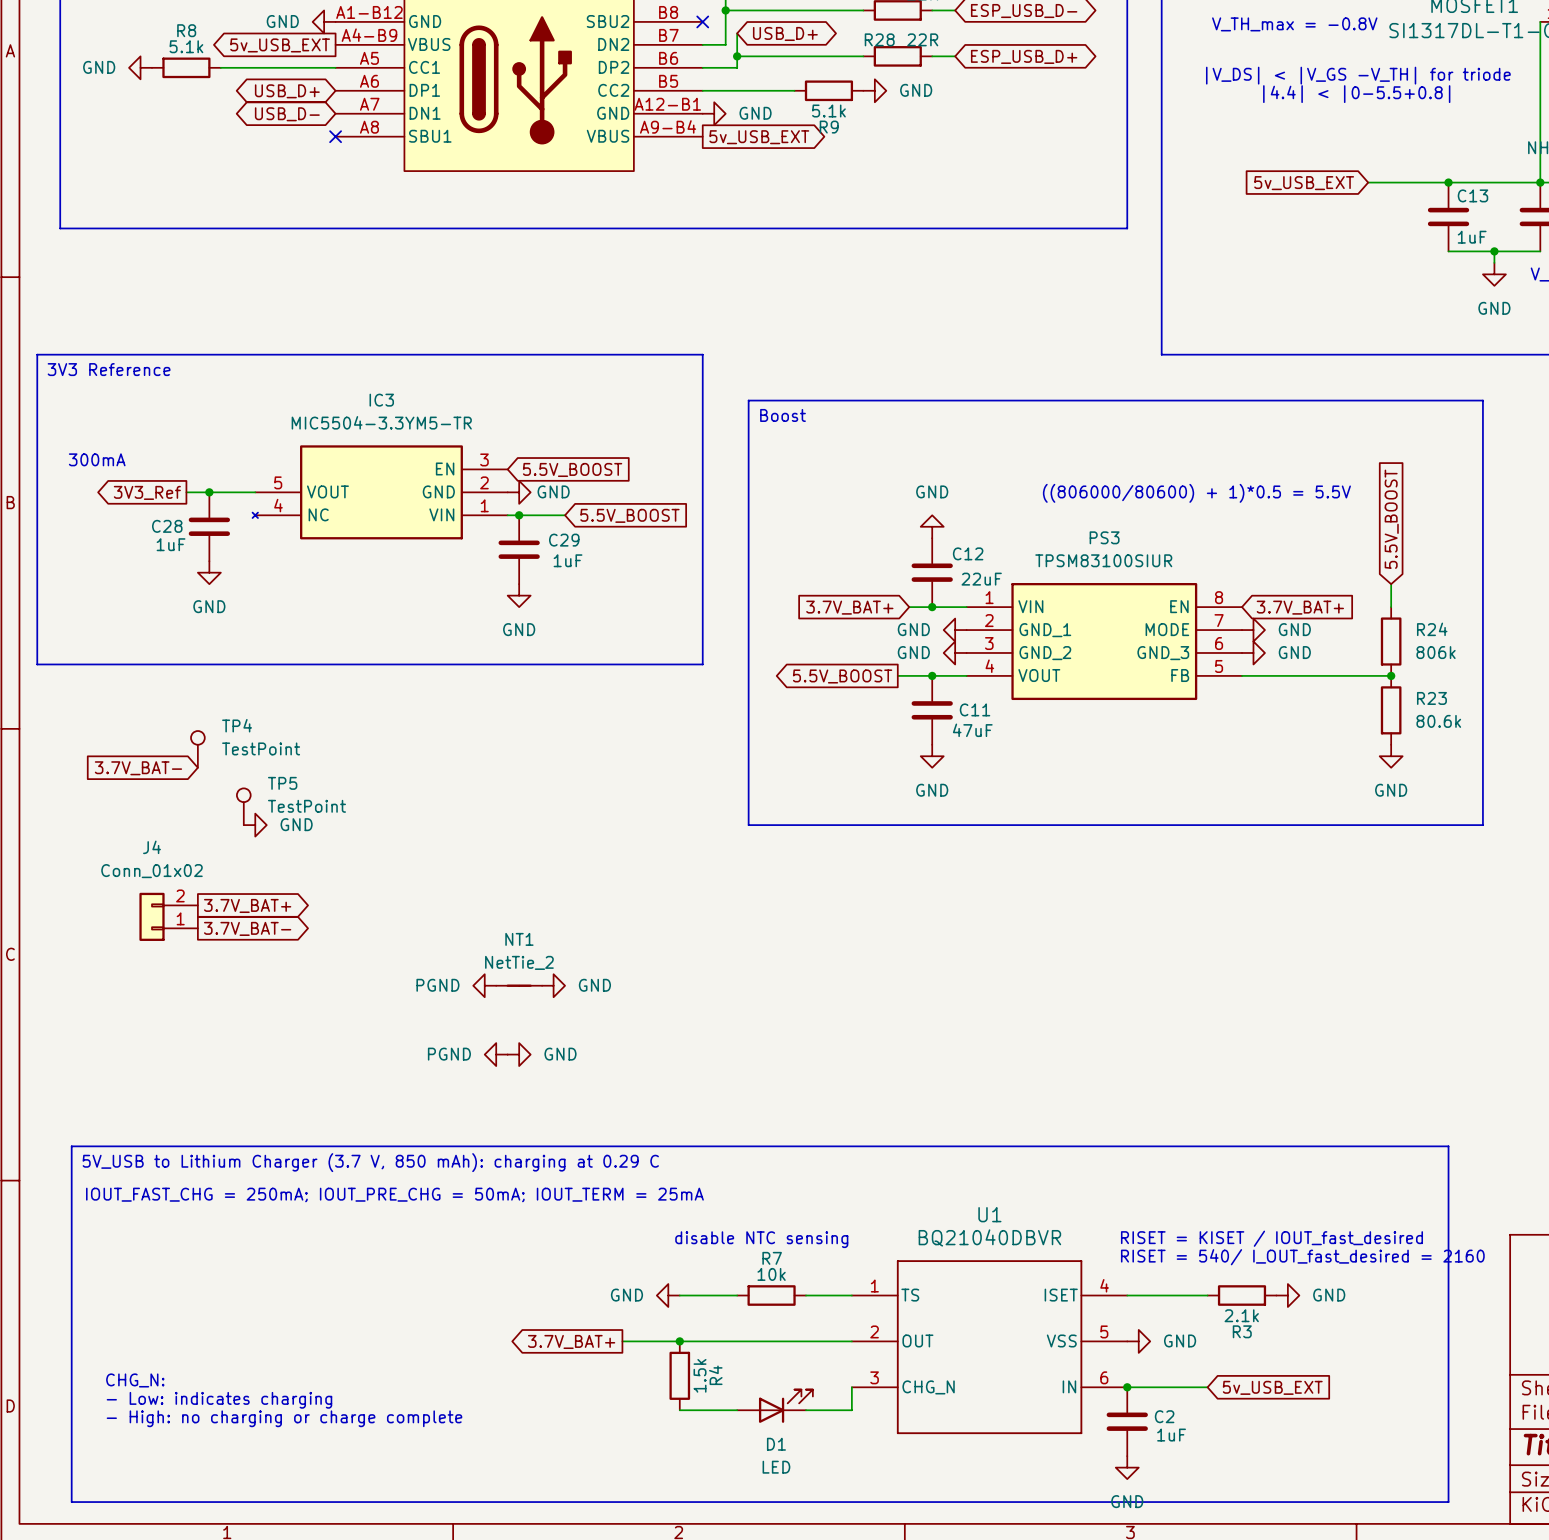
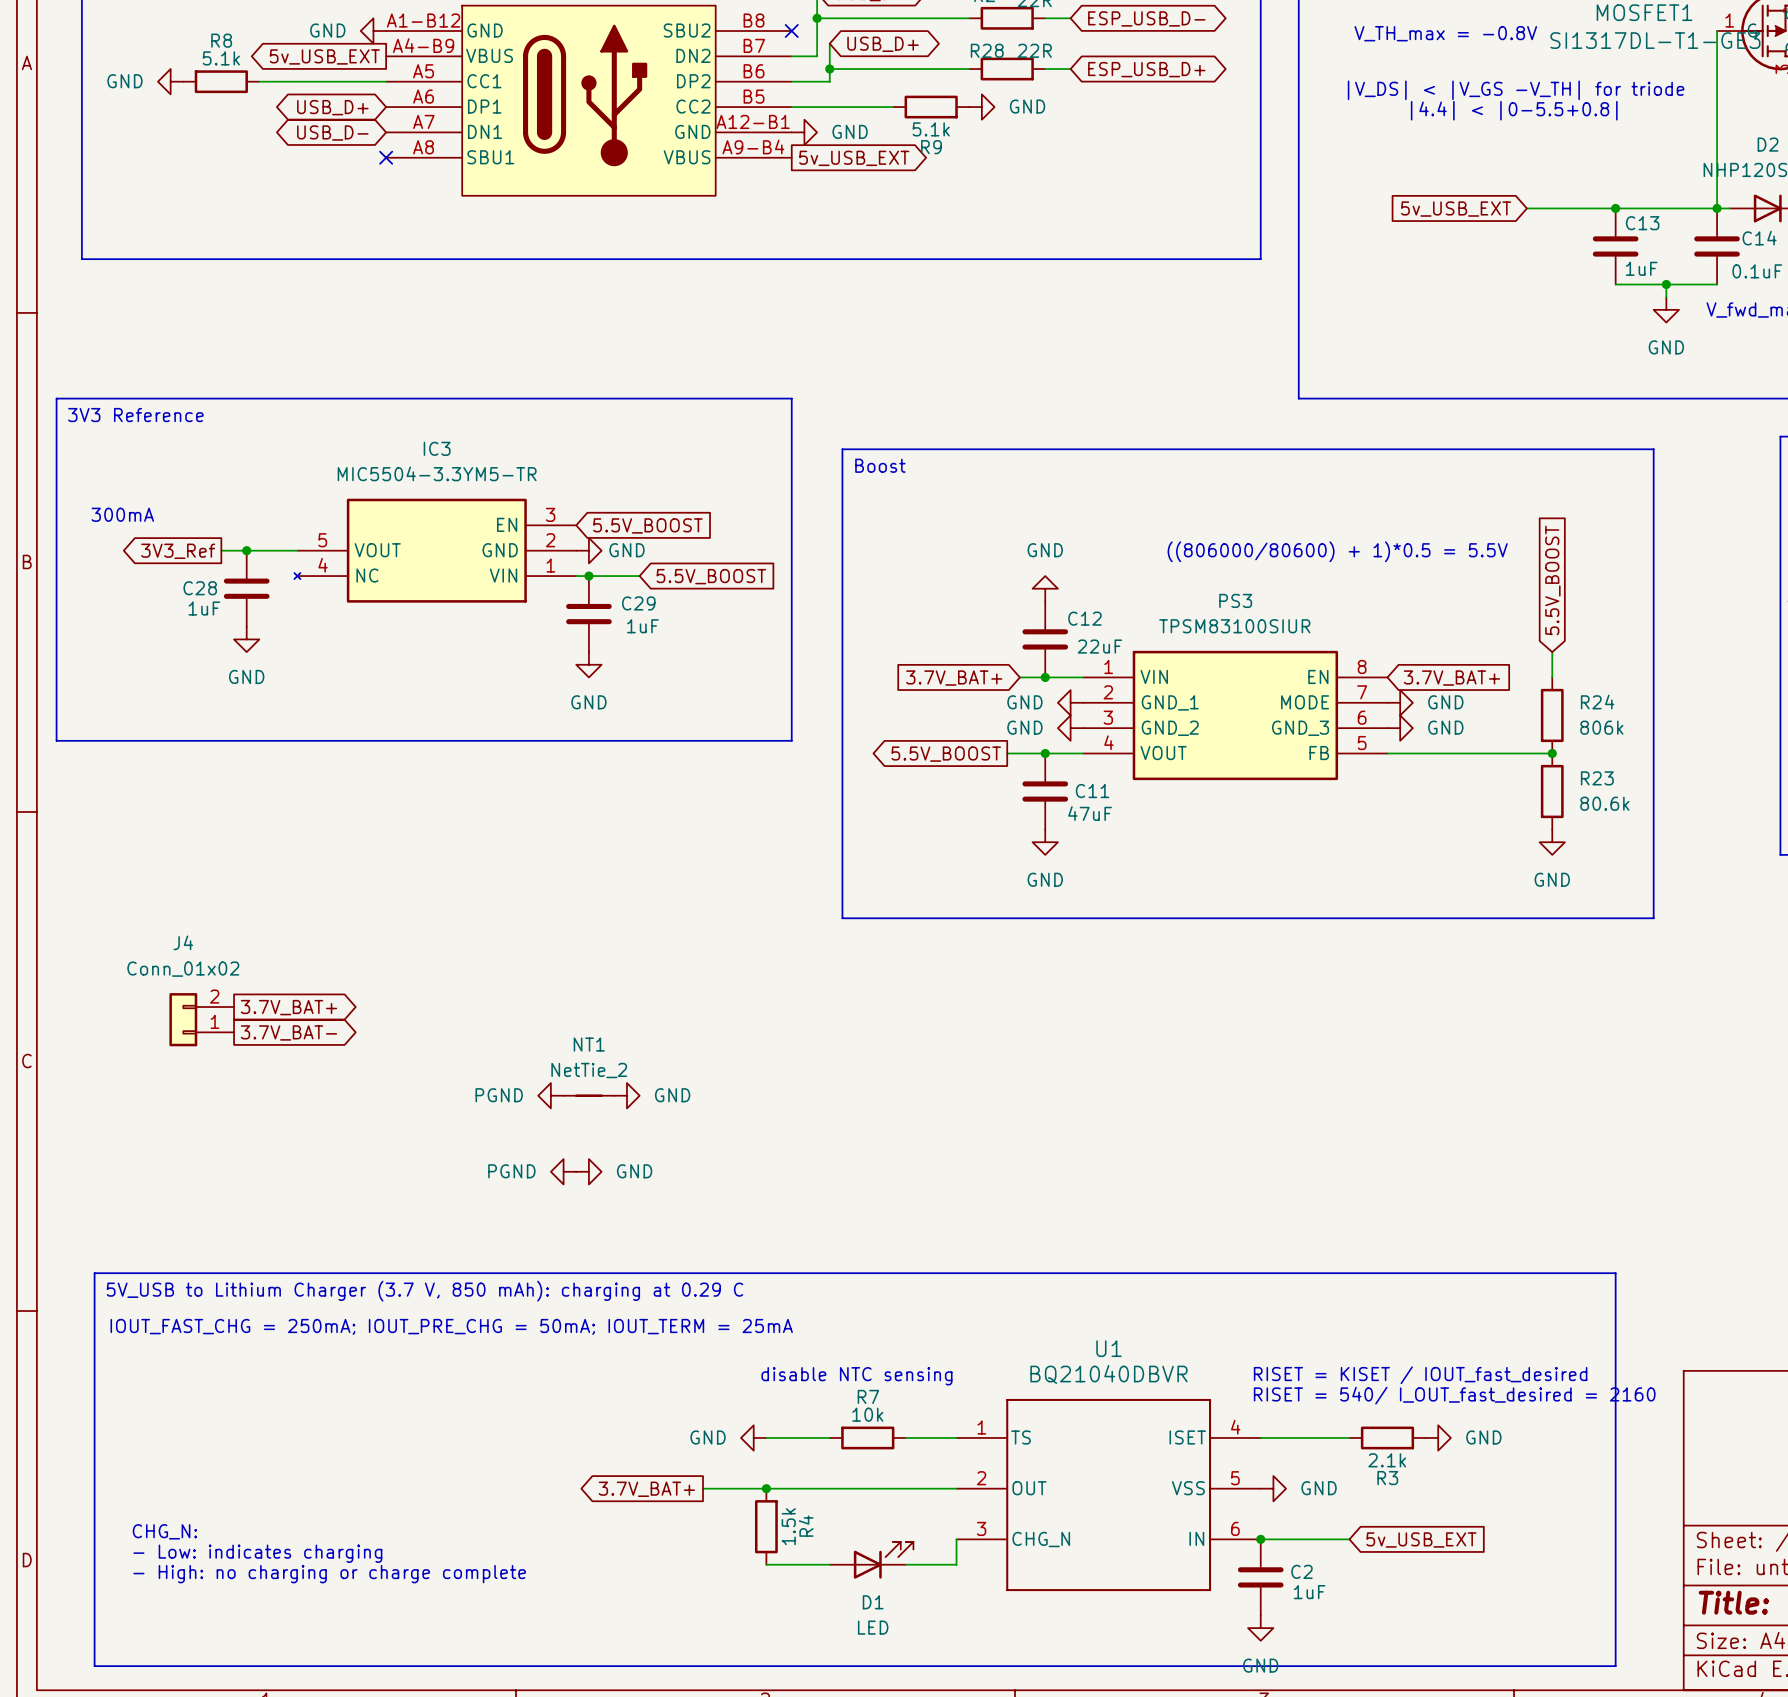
TP4: TestPoint (197, 749) -> none
global label: 3.7V_BAT- (138, 768) -> none
TP5: TestPoint (243, 806) -> none
power symbol: GND (255, 825) -> none

